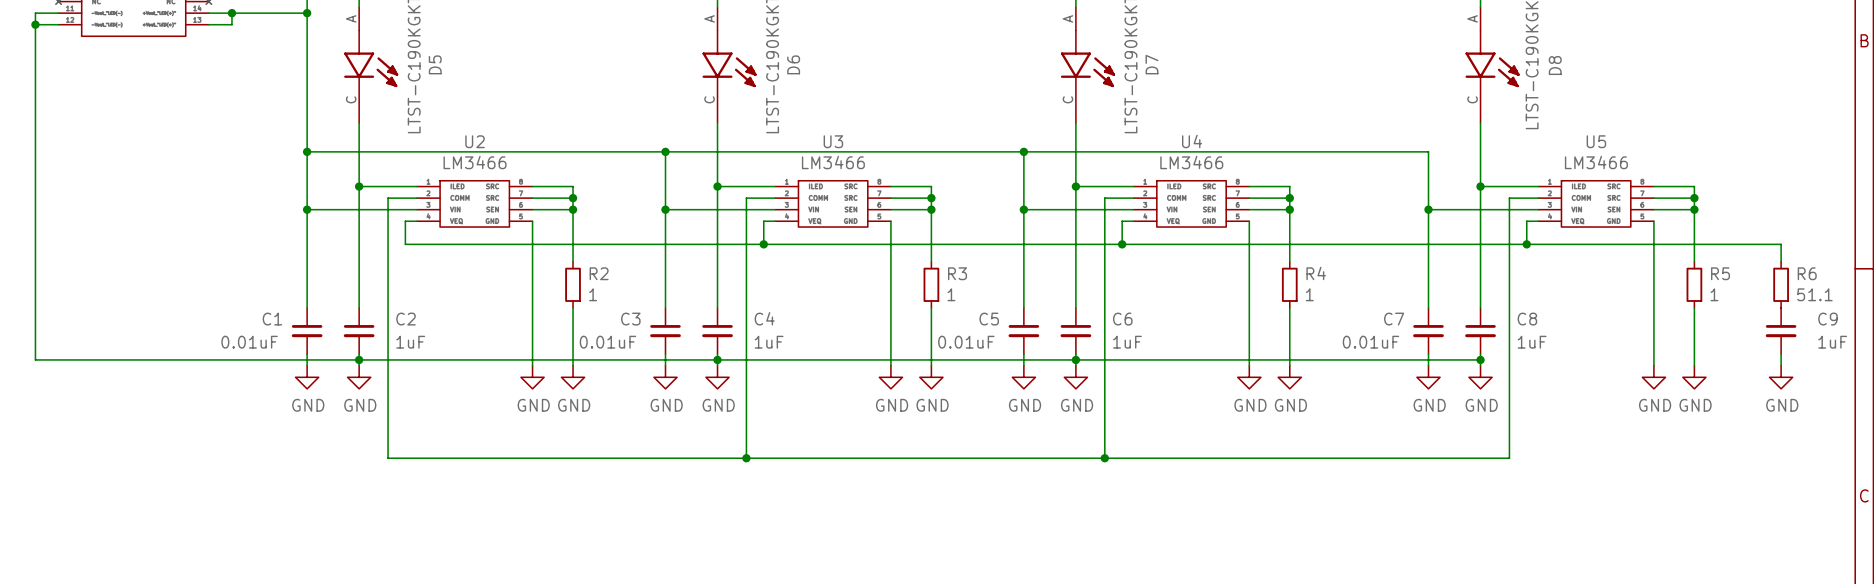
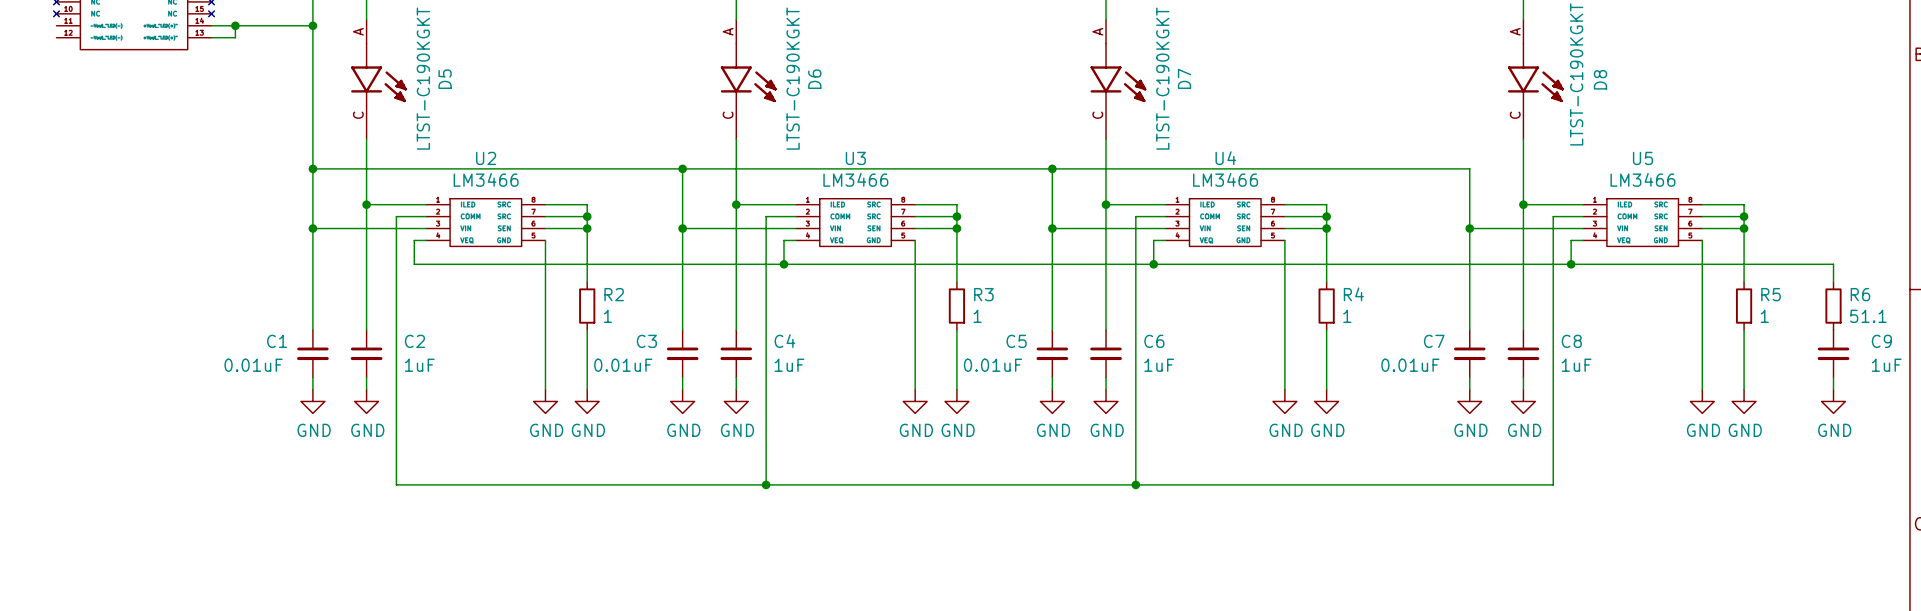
wire: (58, 13) (35, 13) (35, 359) (1480, 359) -> none
wire: (35, 24) (58, 24) -> none
junction: (35, 24) -> none
junction: (359, 359) -> none
junction: (717, 359) -> none
junction: (1075, 359) -> none
junction: (1480, 359) -> none

